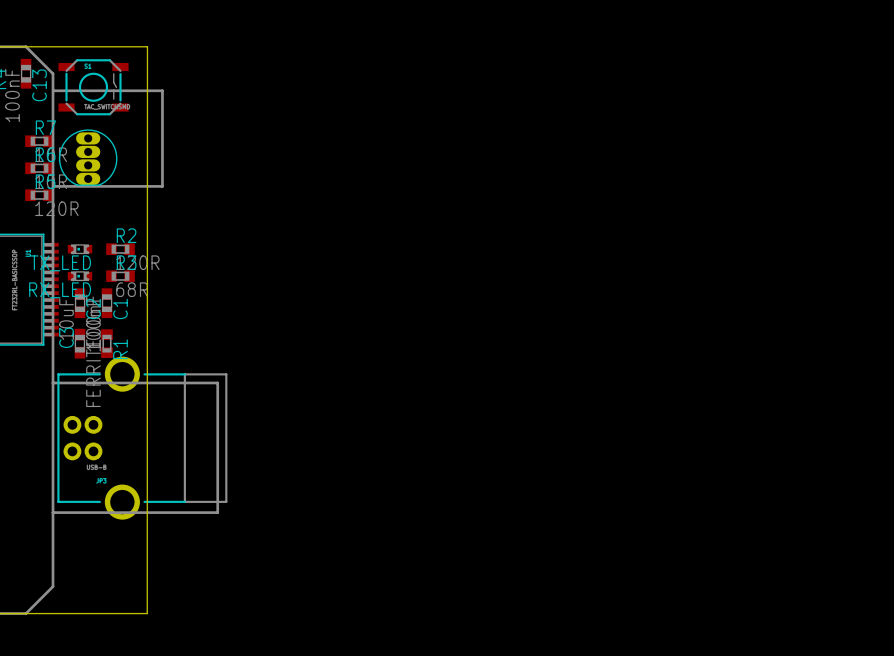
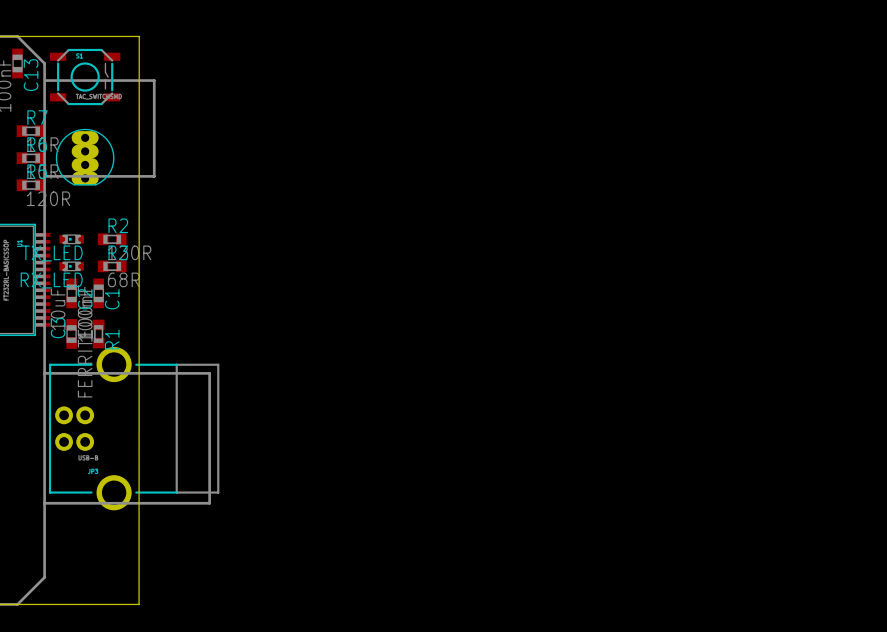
part: (88, 157) -> none
part: none -> (85, 157)

